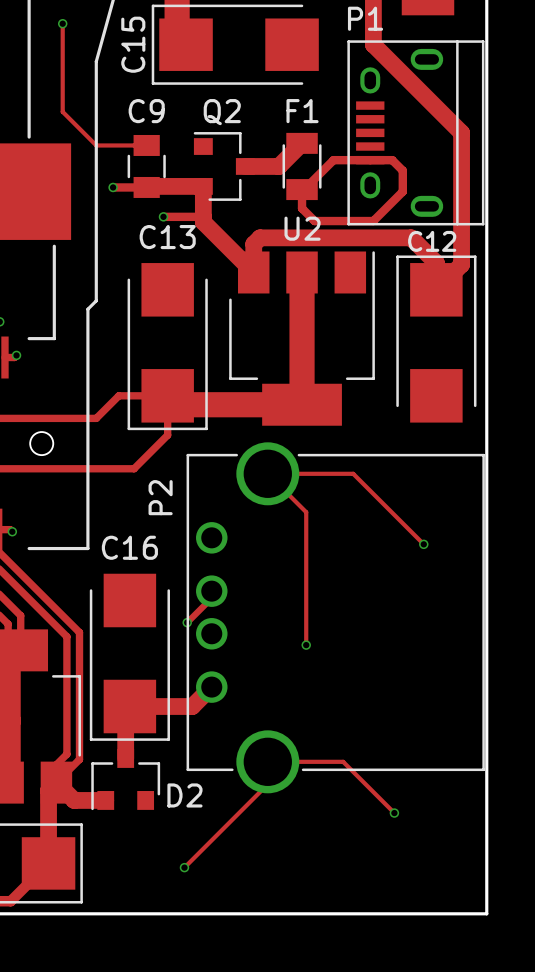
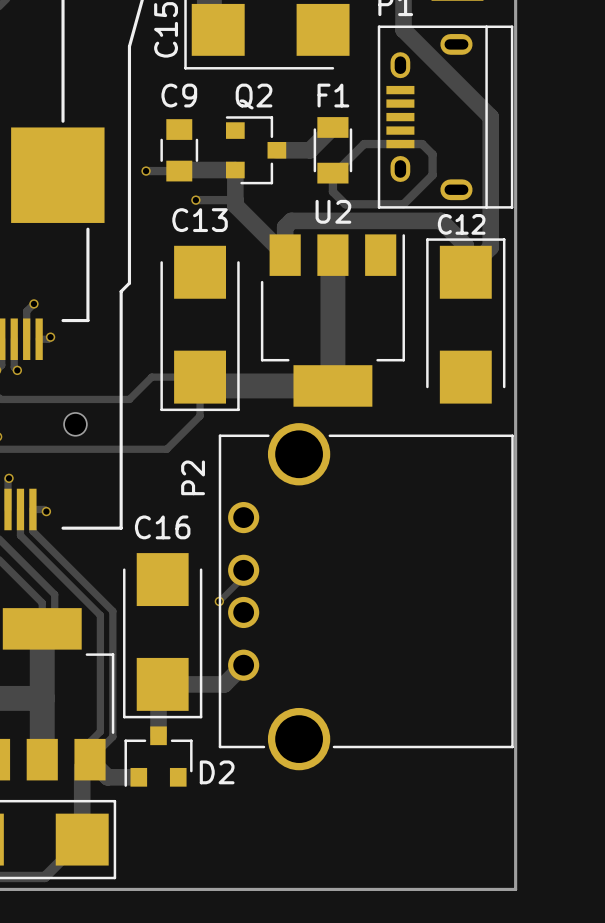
track: (62, 23) (62, 111) (96, 145) (146, 145) -> none
via: (62, 23) -> none
track: (423, 544) (353, 473) (267, 473) (306, 512) (306, 645) -> none
via: (423, 544) -> none
via: (306, 645) -> none
track: (394, 813) (343, 761) (267, 761) (267, 784) (184, 867) -> none
via: (394, 813) -> none
via: (184, 867) -> none

